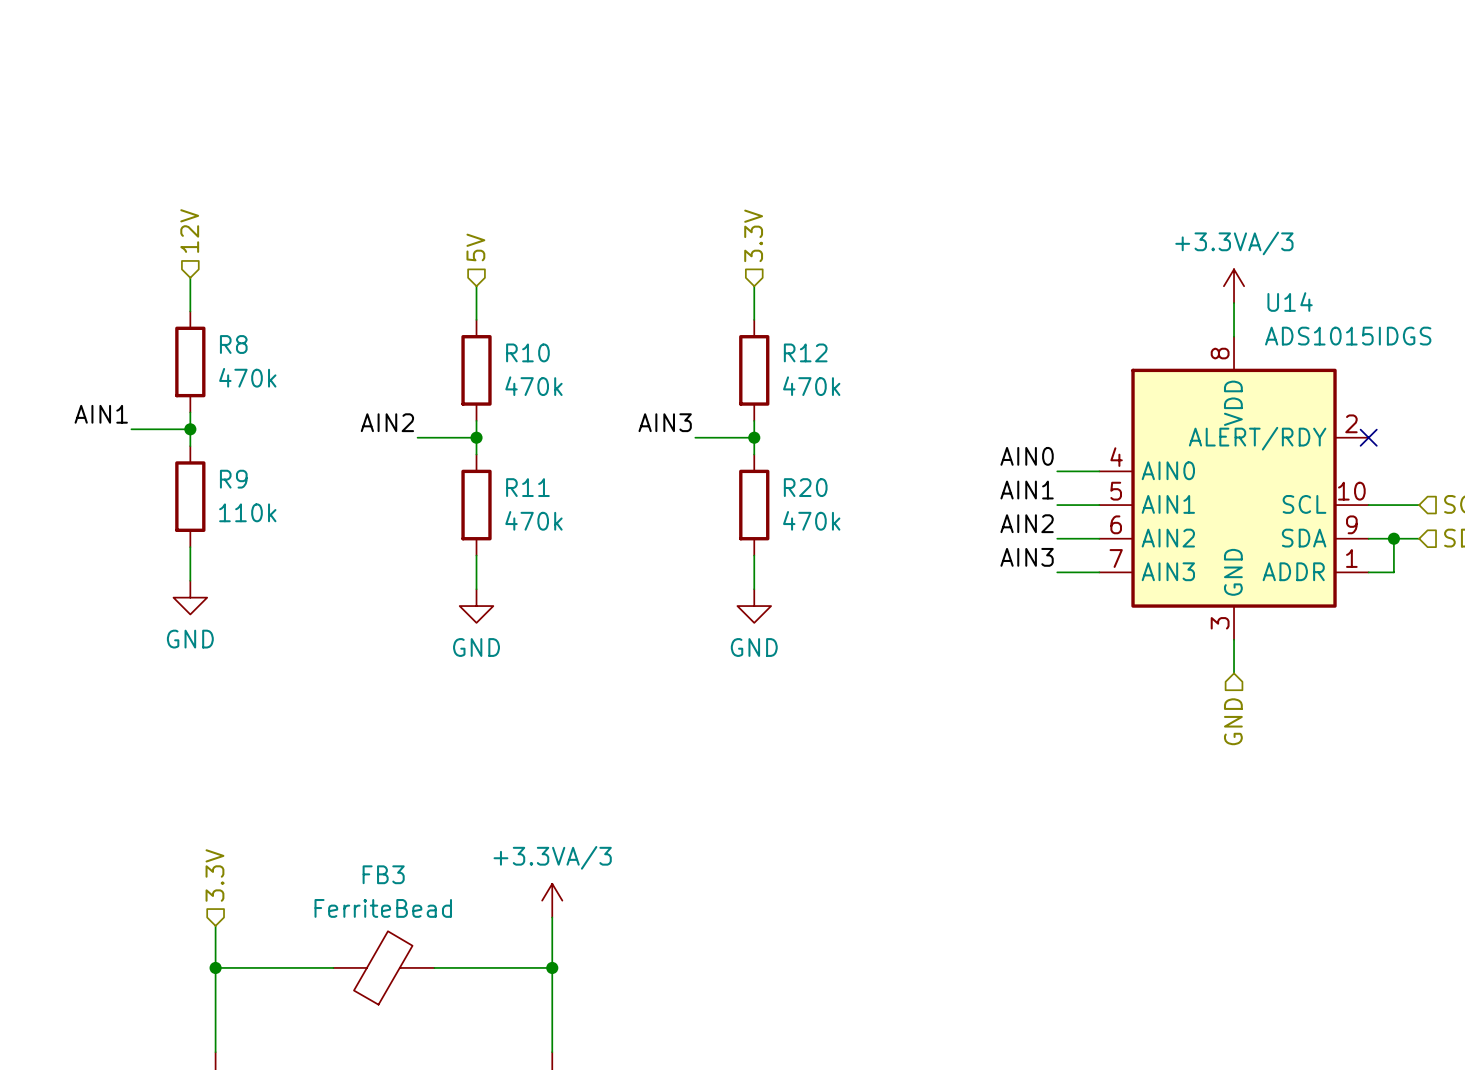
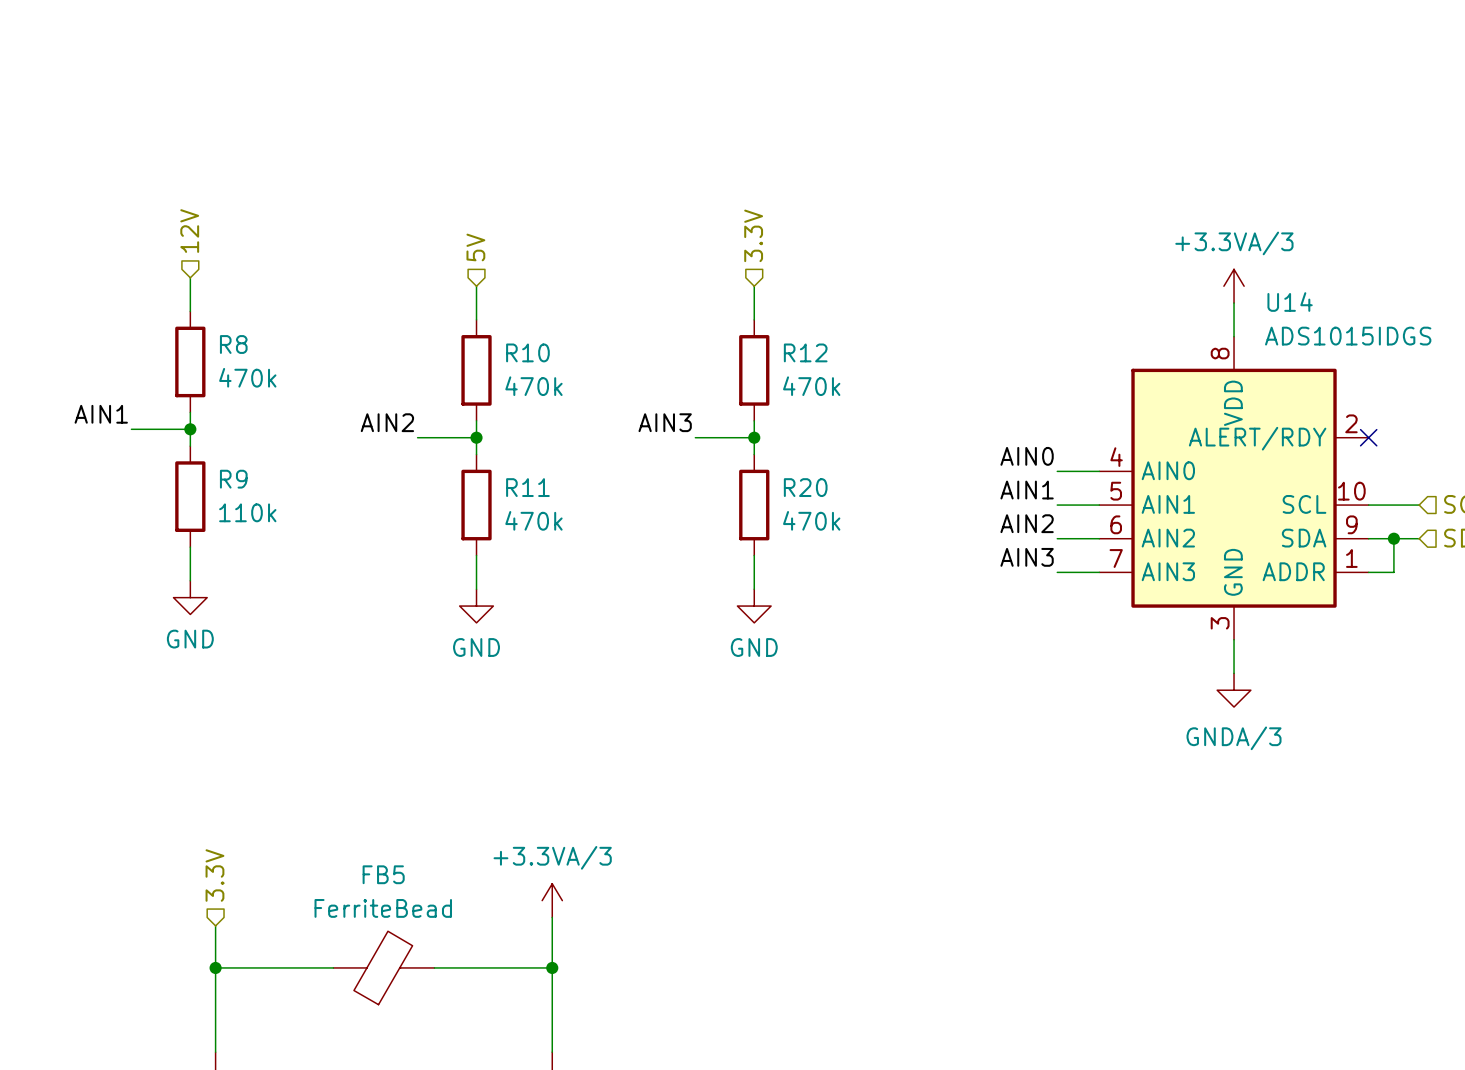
power symbol: none -> GNDA/3 (1234, 690)
hierarchical label: GND (1233, 721) -> none
FB3 name: FB3 (383, 874) -> FB5 (383, 874)

